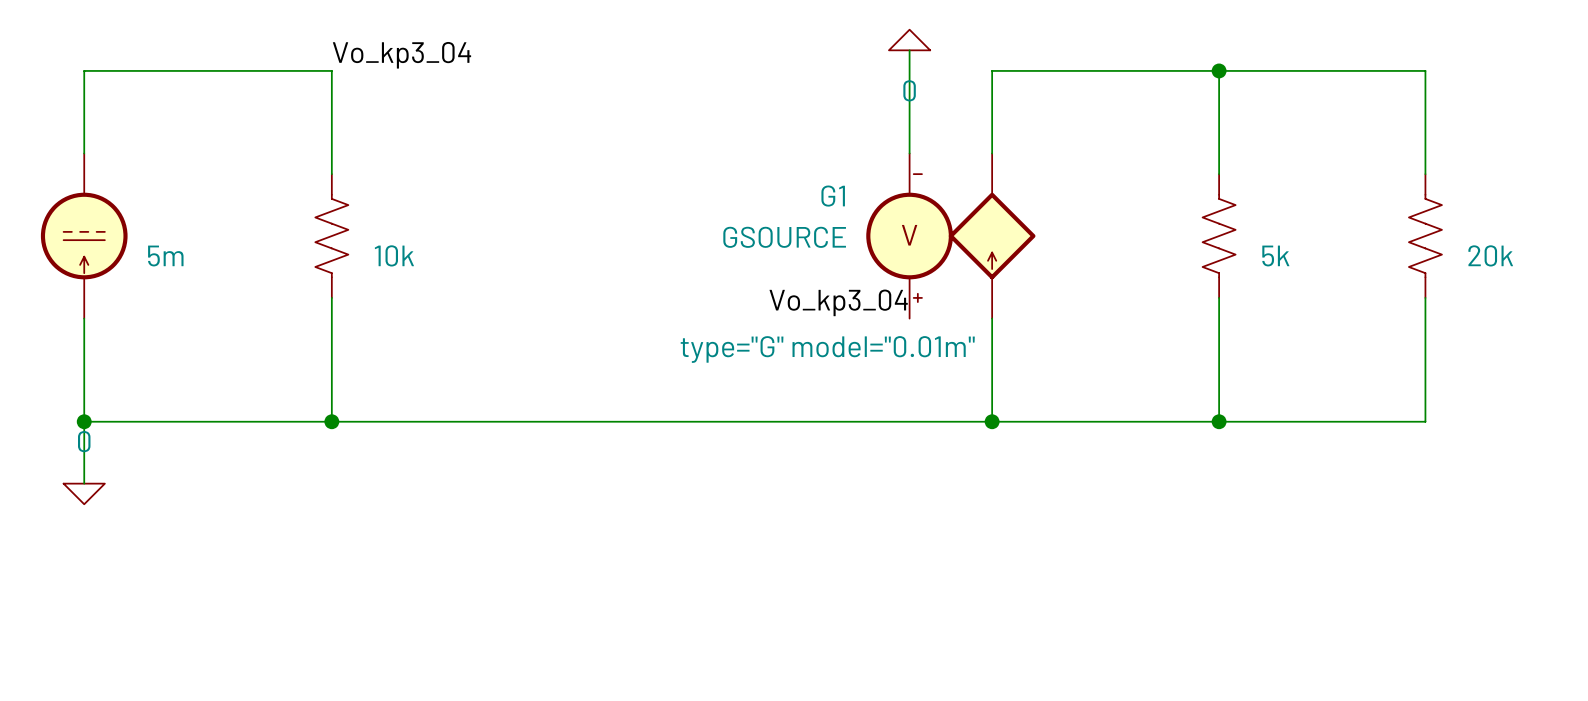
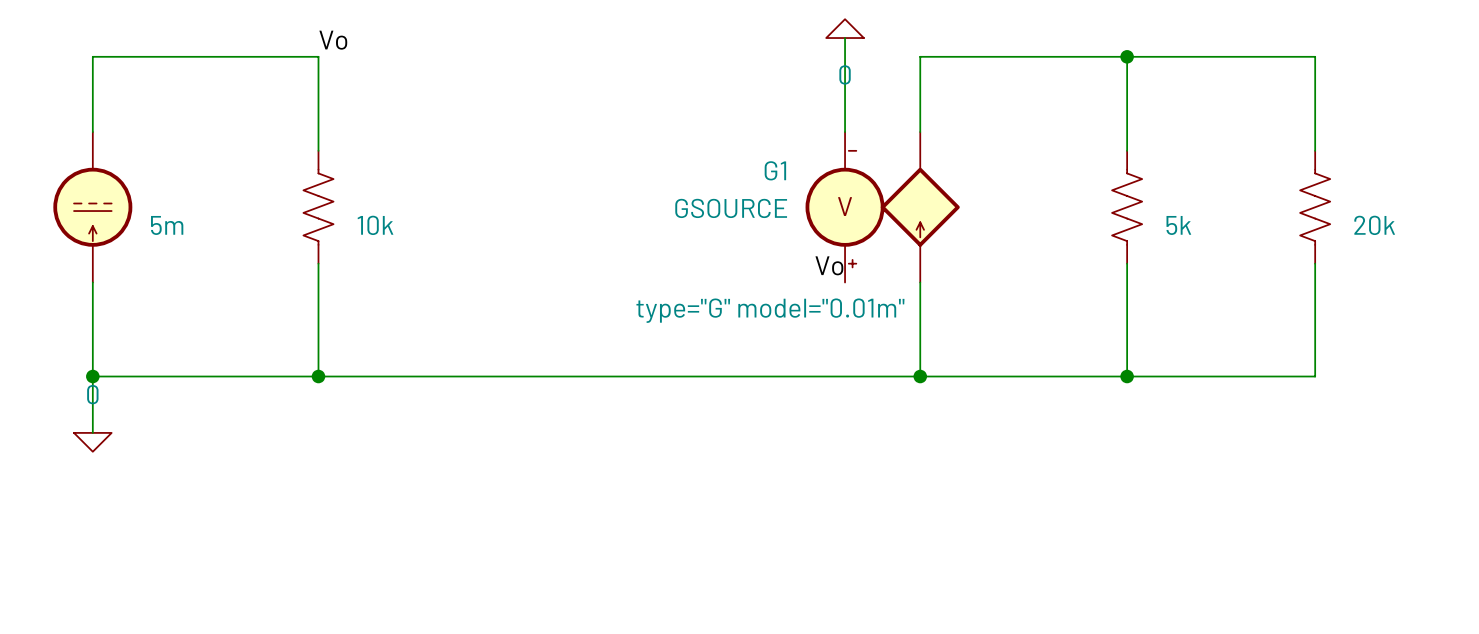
label: Vo_kp3_04 (401, 55) -> Vo (333, 40)
label: Vo_kp3_04 (838, 302) -> Vo (829, 265)

